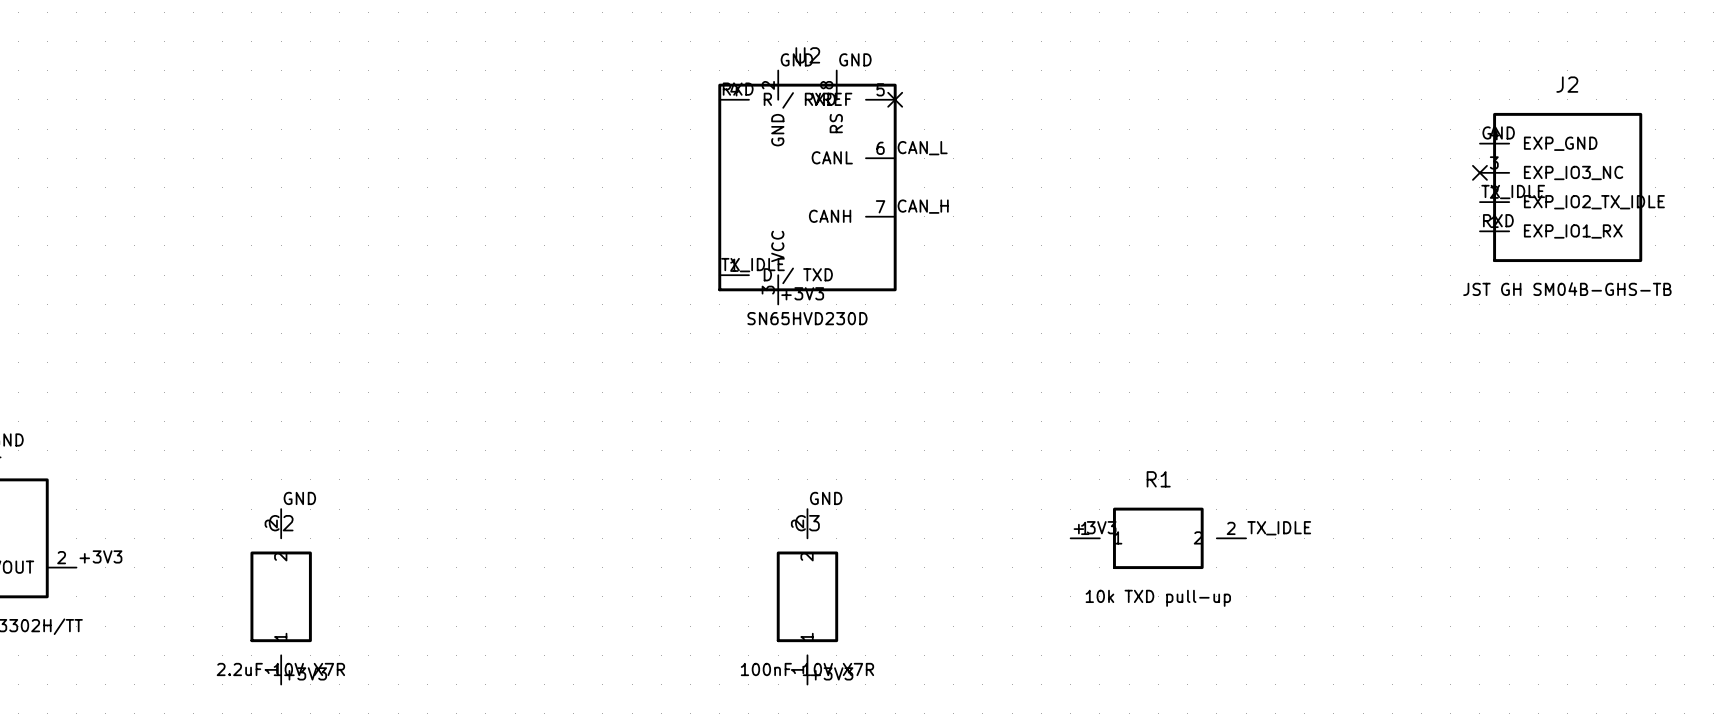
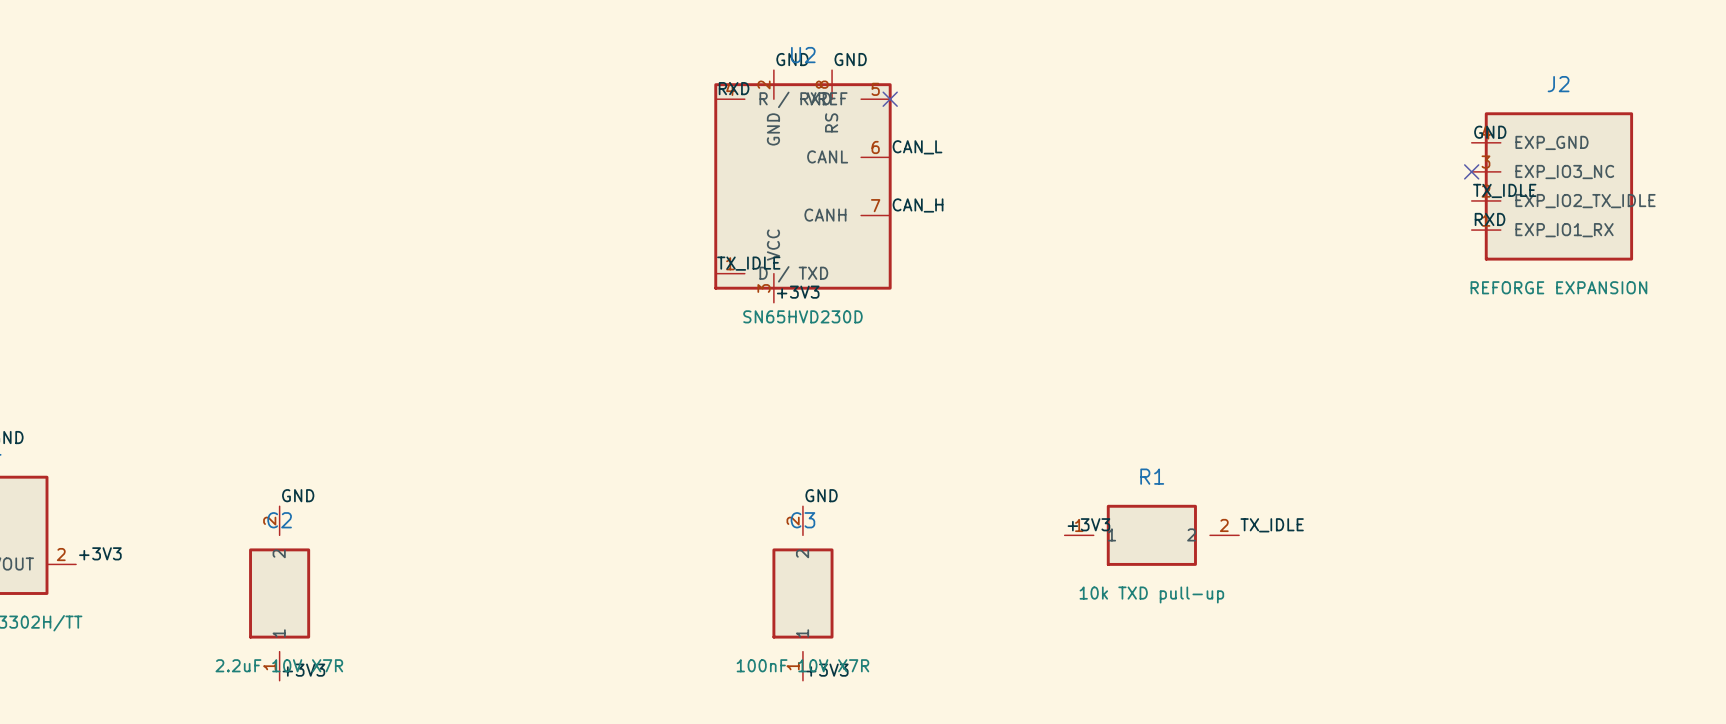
J2 value: JST GH SM04B-GHS-TB (1567, 289) -> REFORGE EXPANSION (1558, 287)

